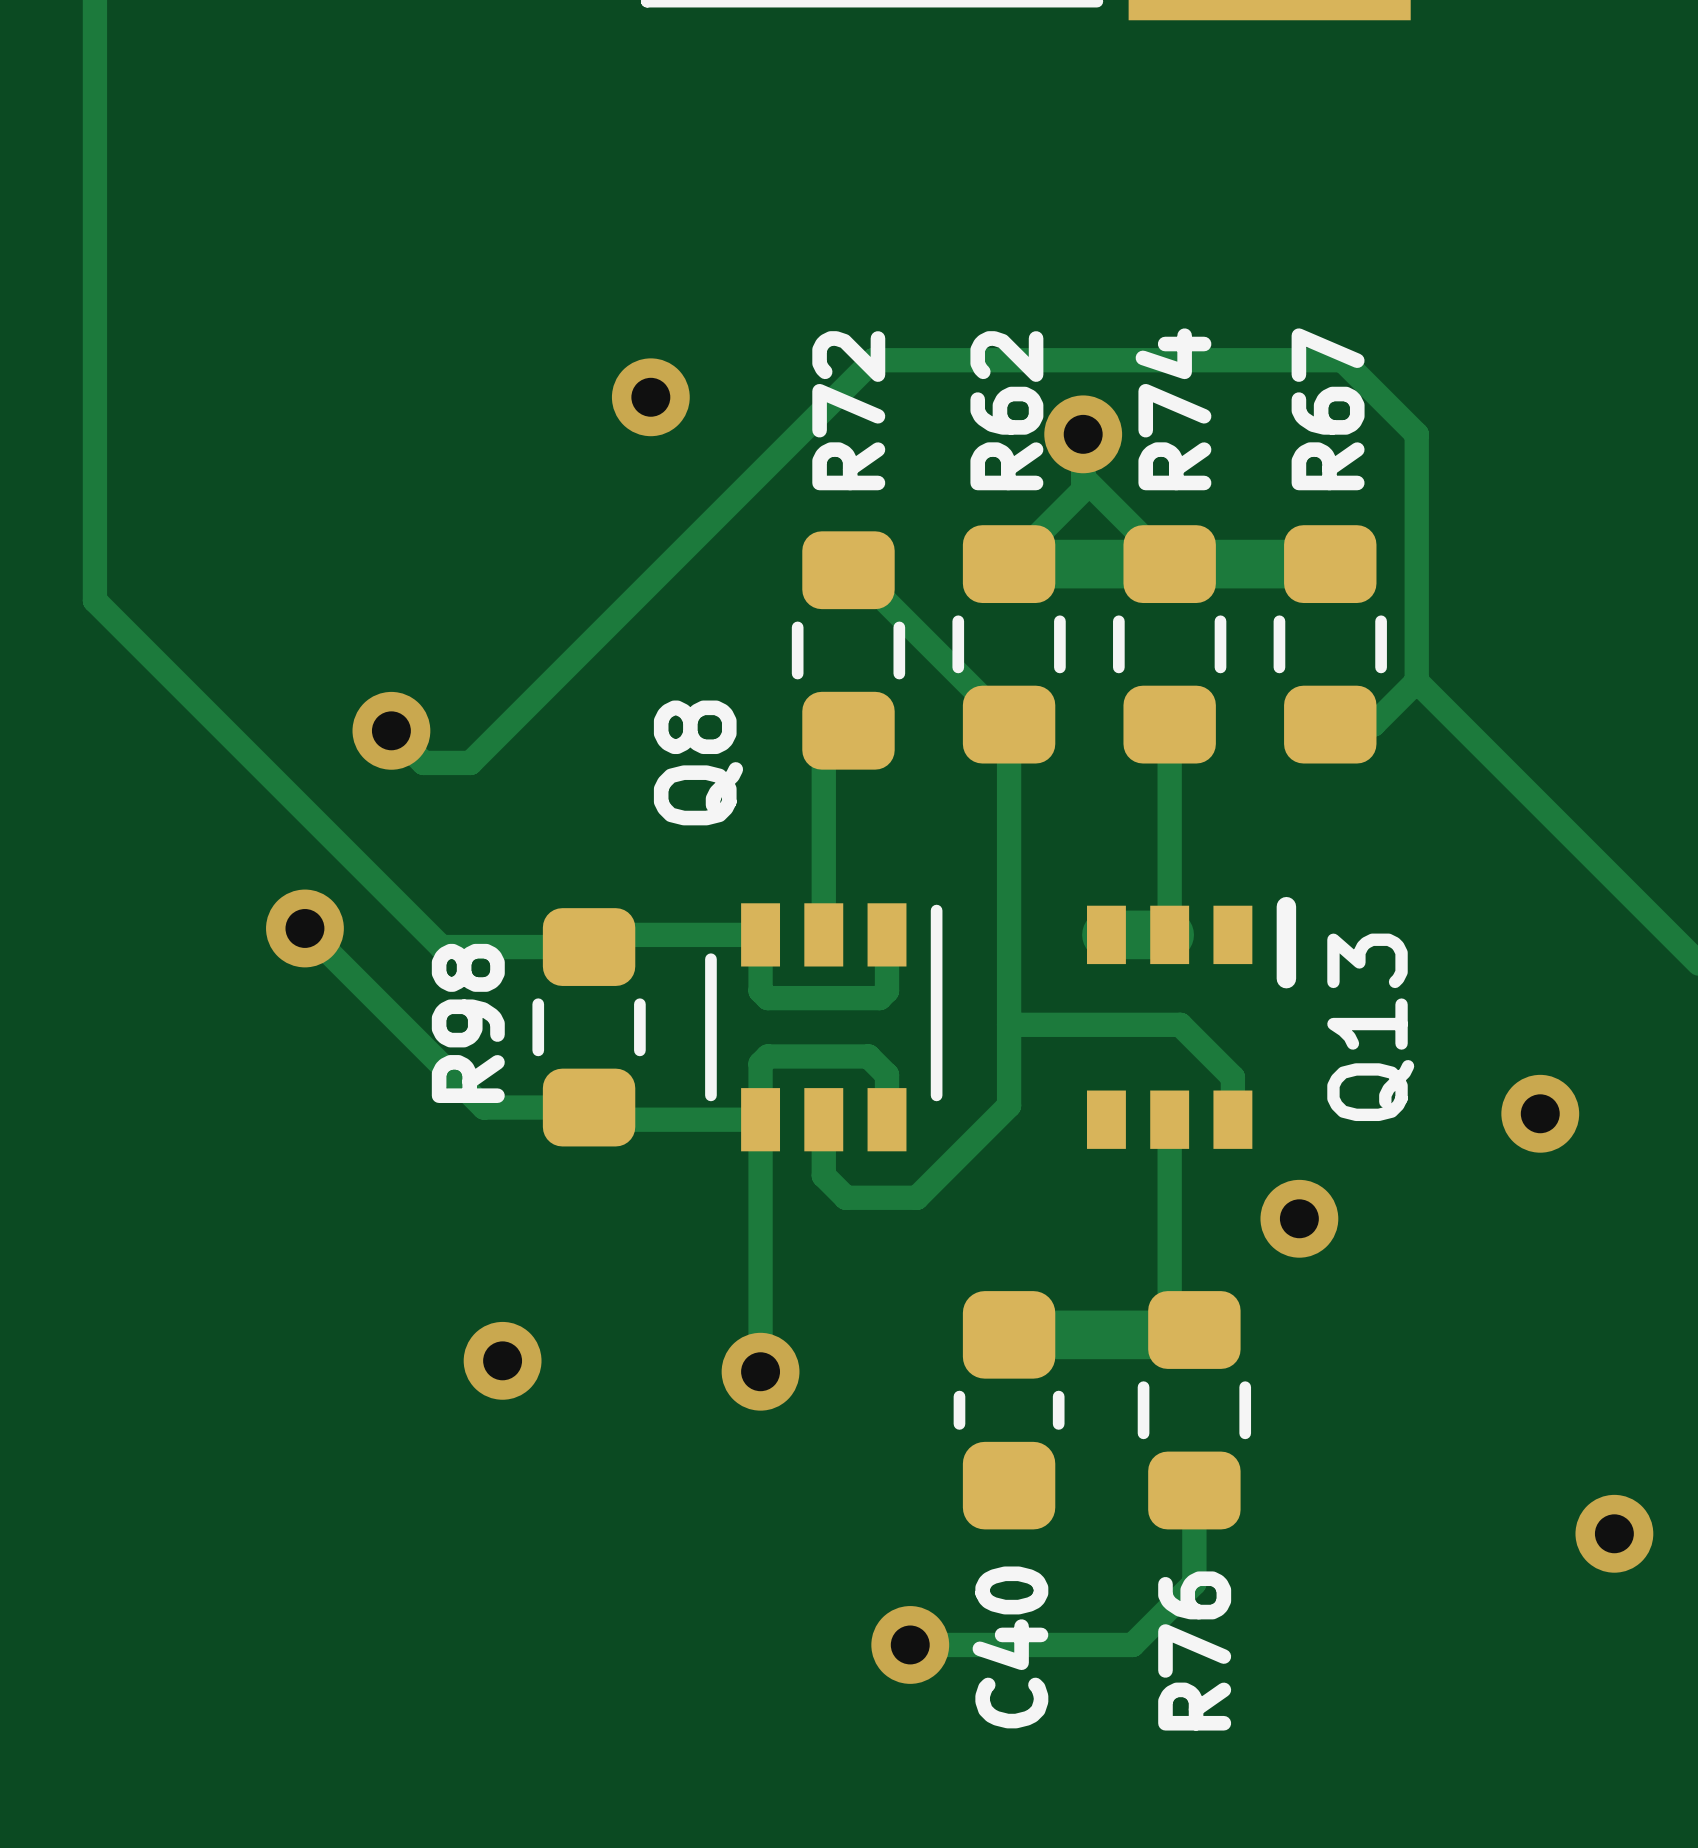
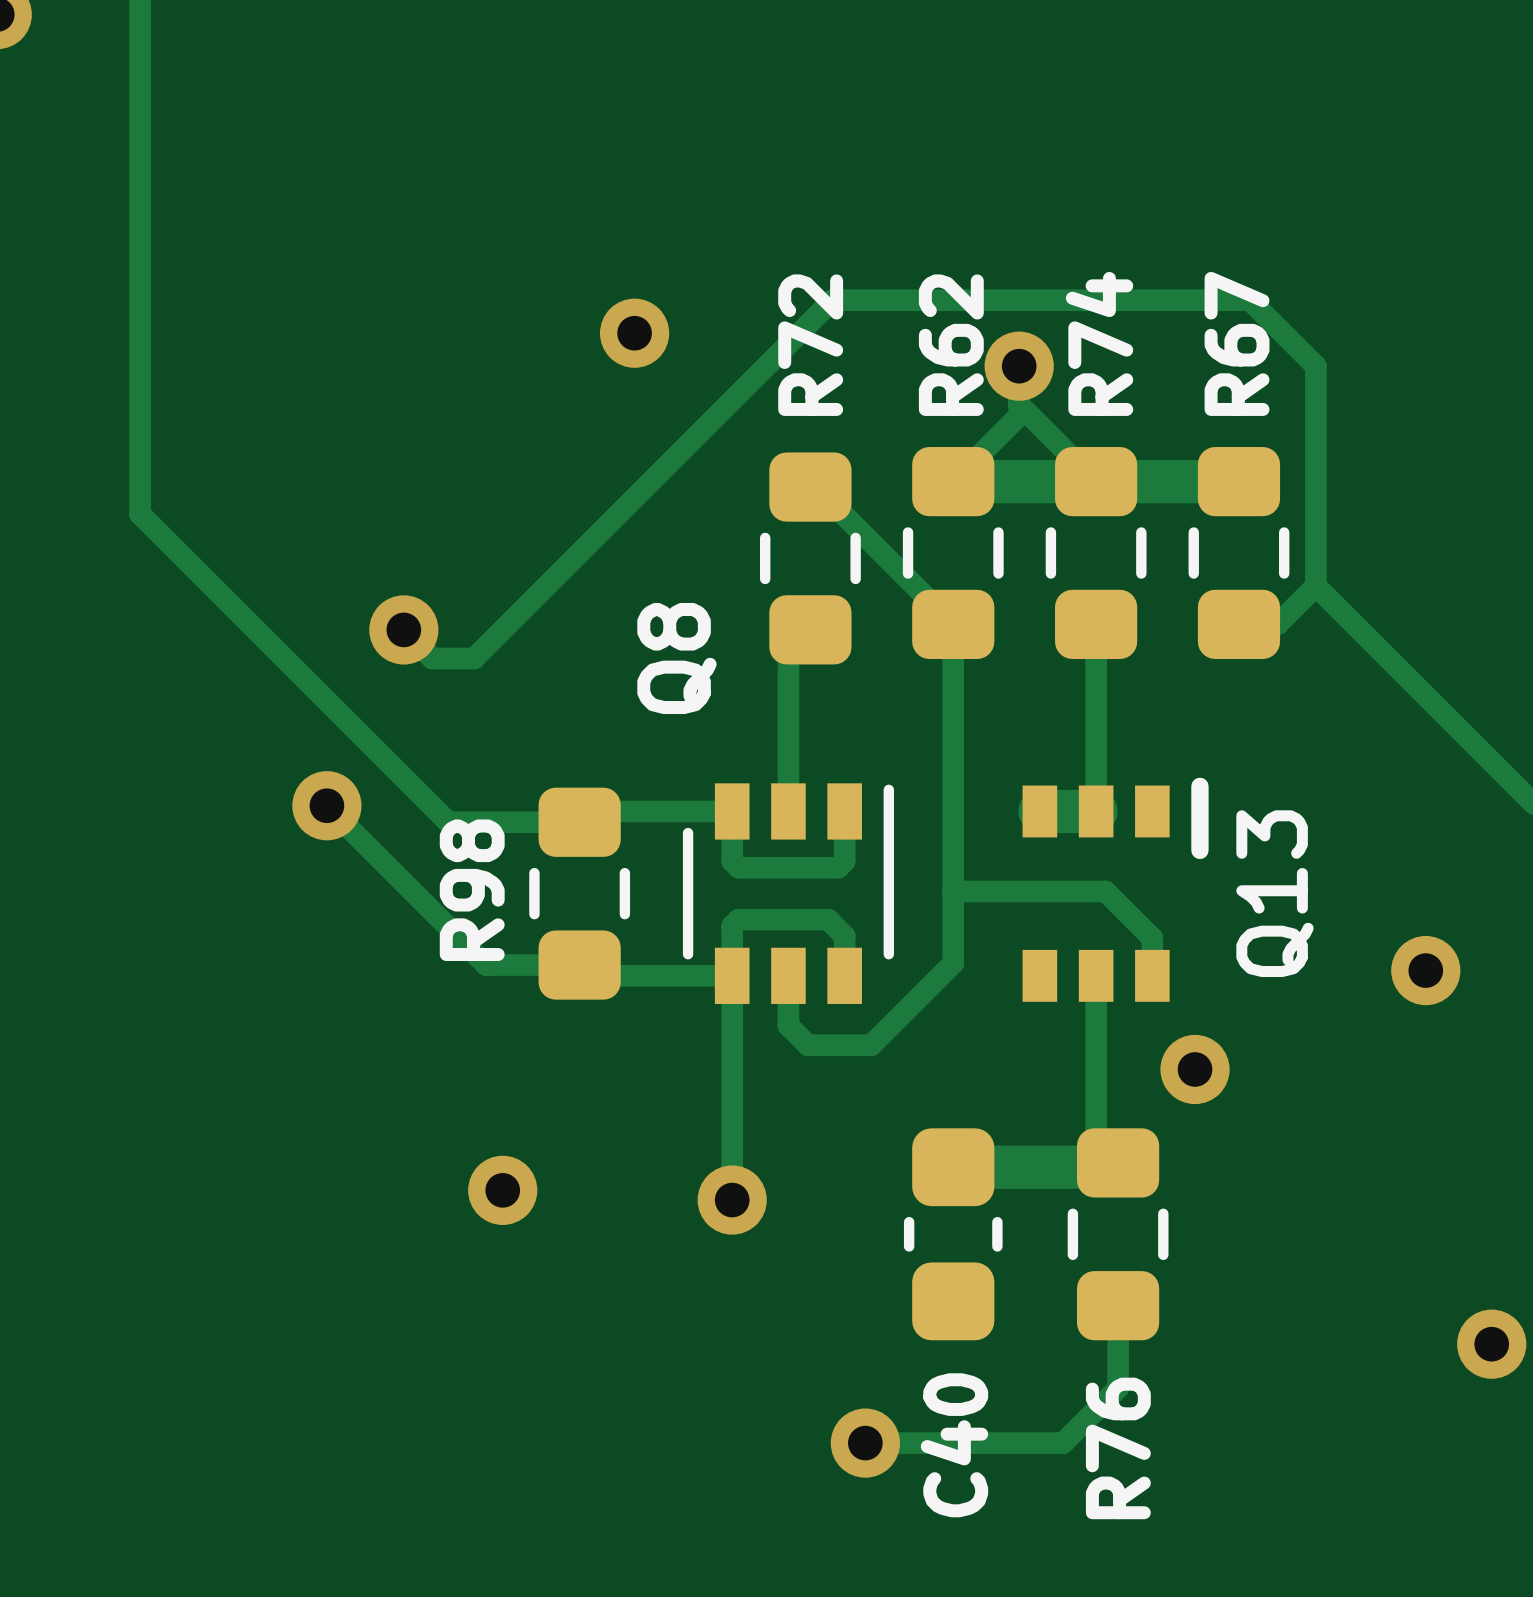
via position: (1299, 1218) -> (1195, 1069)

